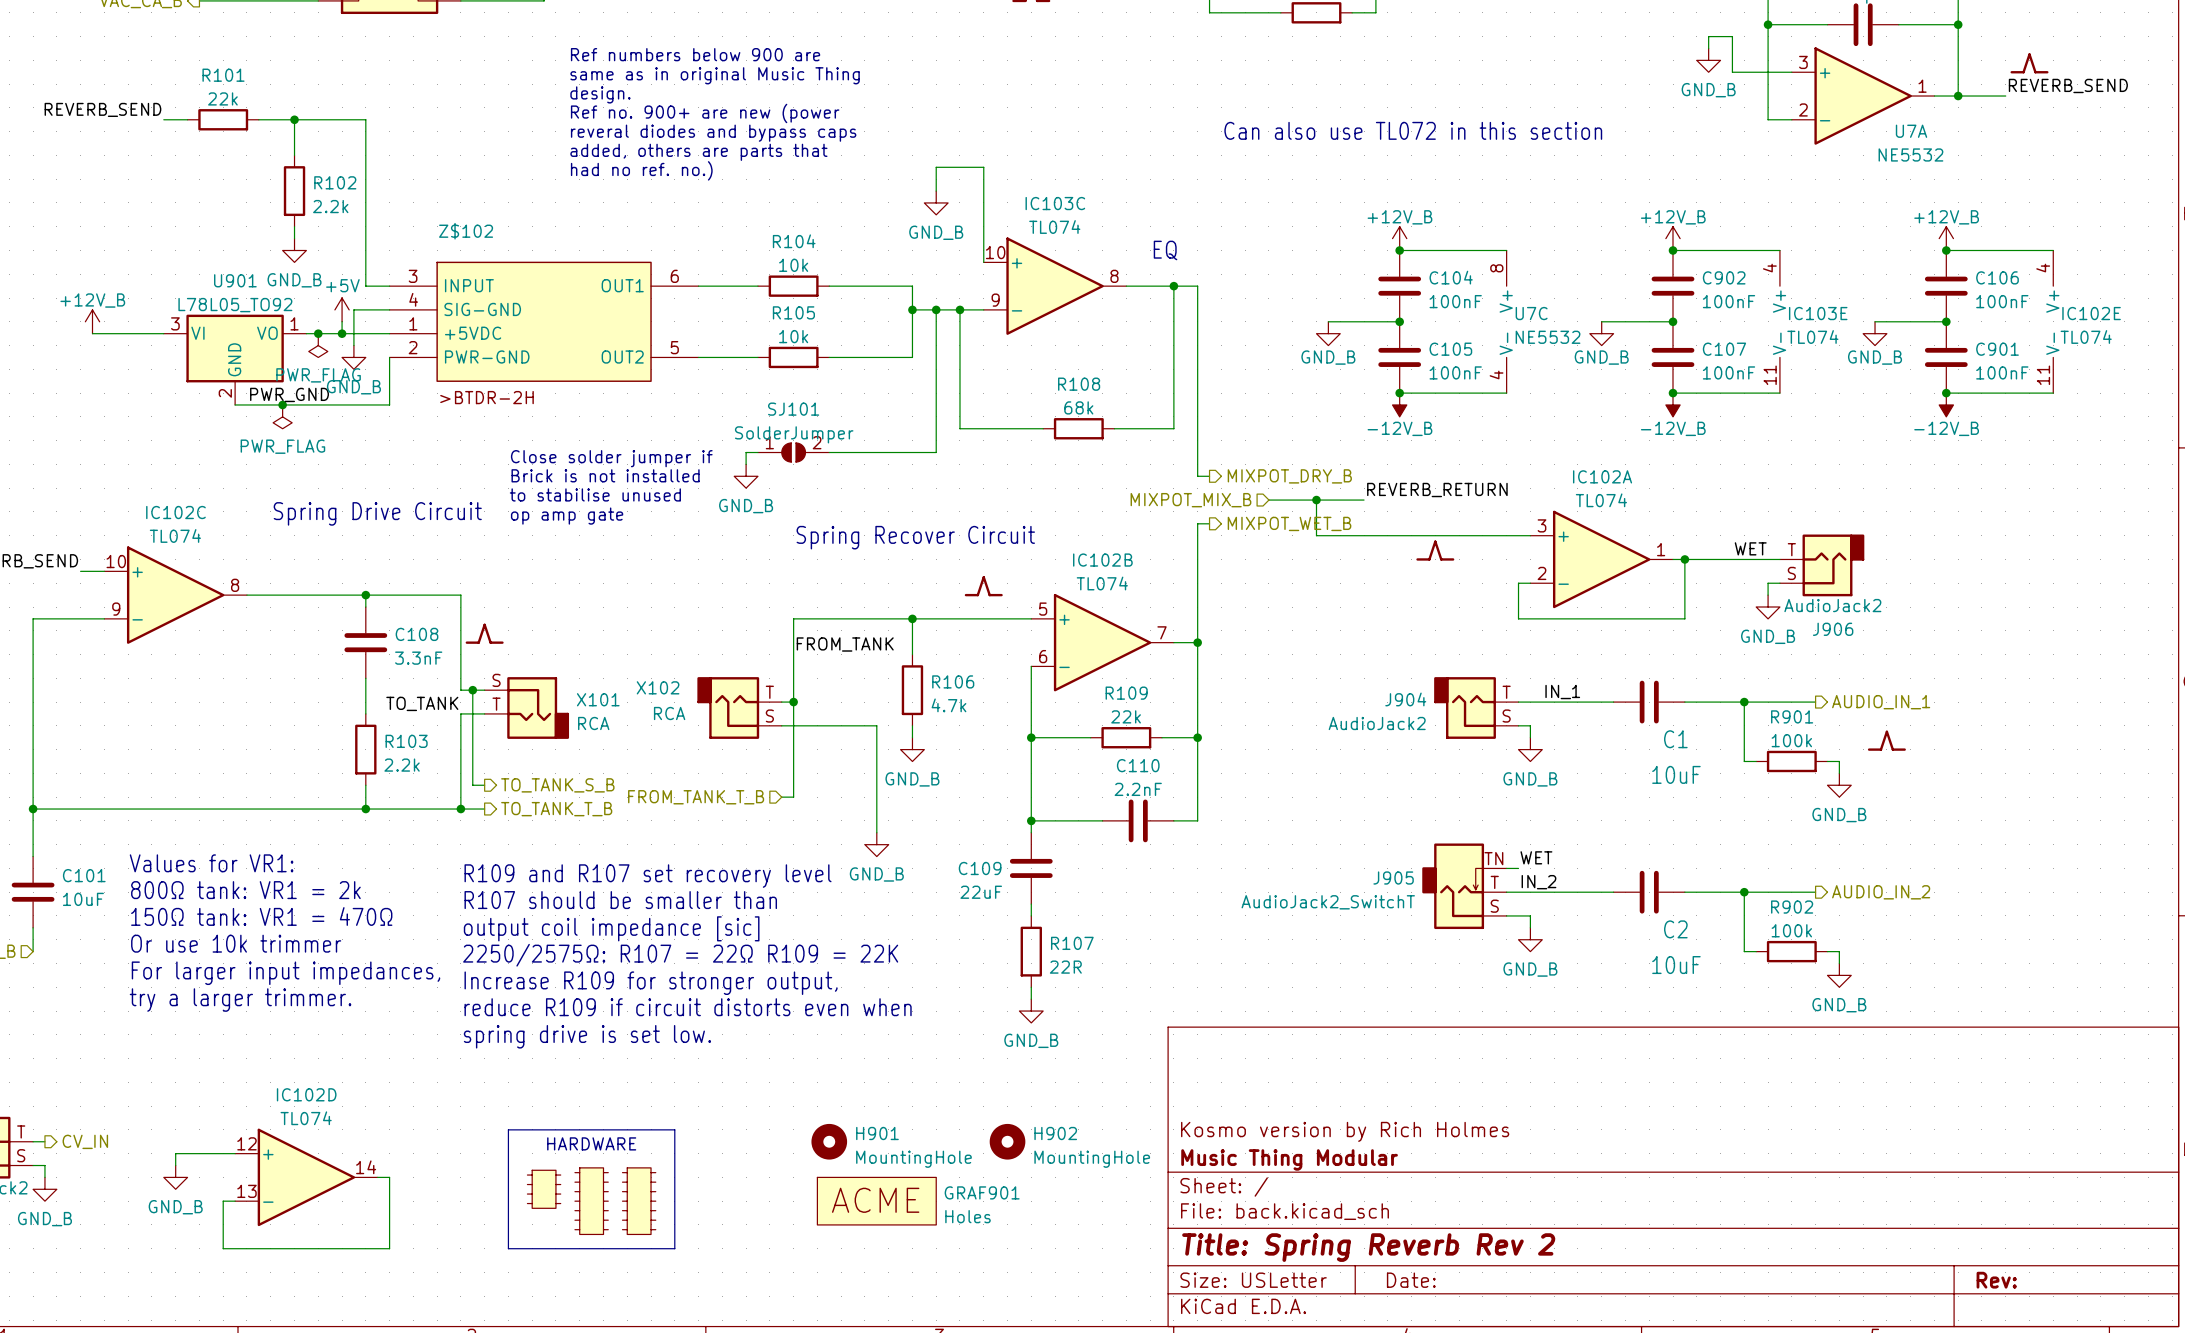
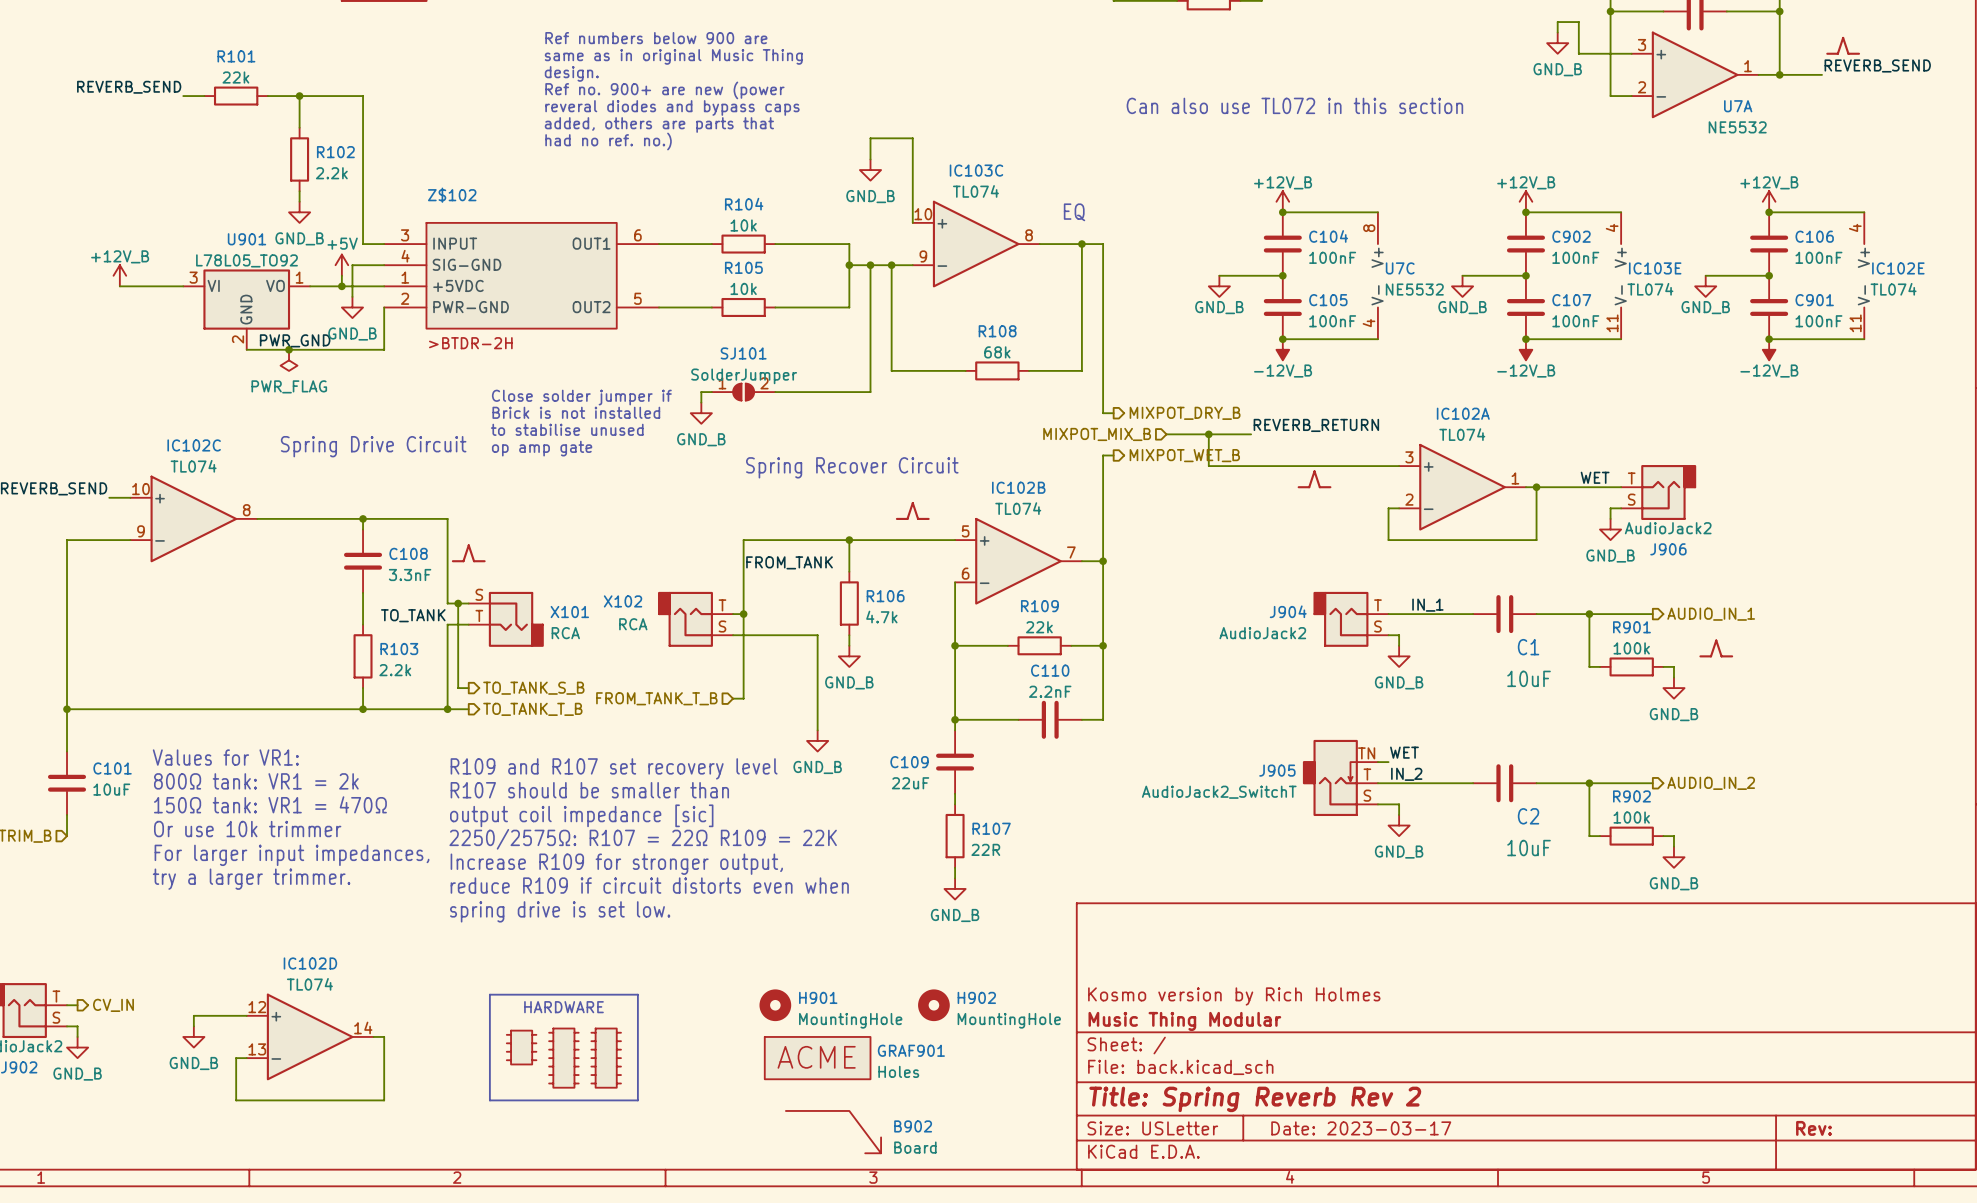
junction: (318, 333) -> none
power symbol: PWR_FLAG (318, 345) -> none
title block: Date: (1411, 1280) -> Date: 2023-03-17 (1361, 1128)
B902: none -> Board (833, 1132)

